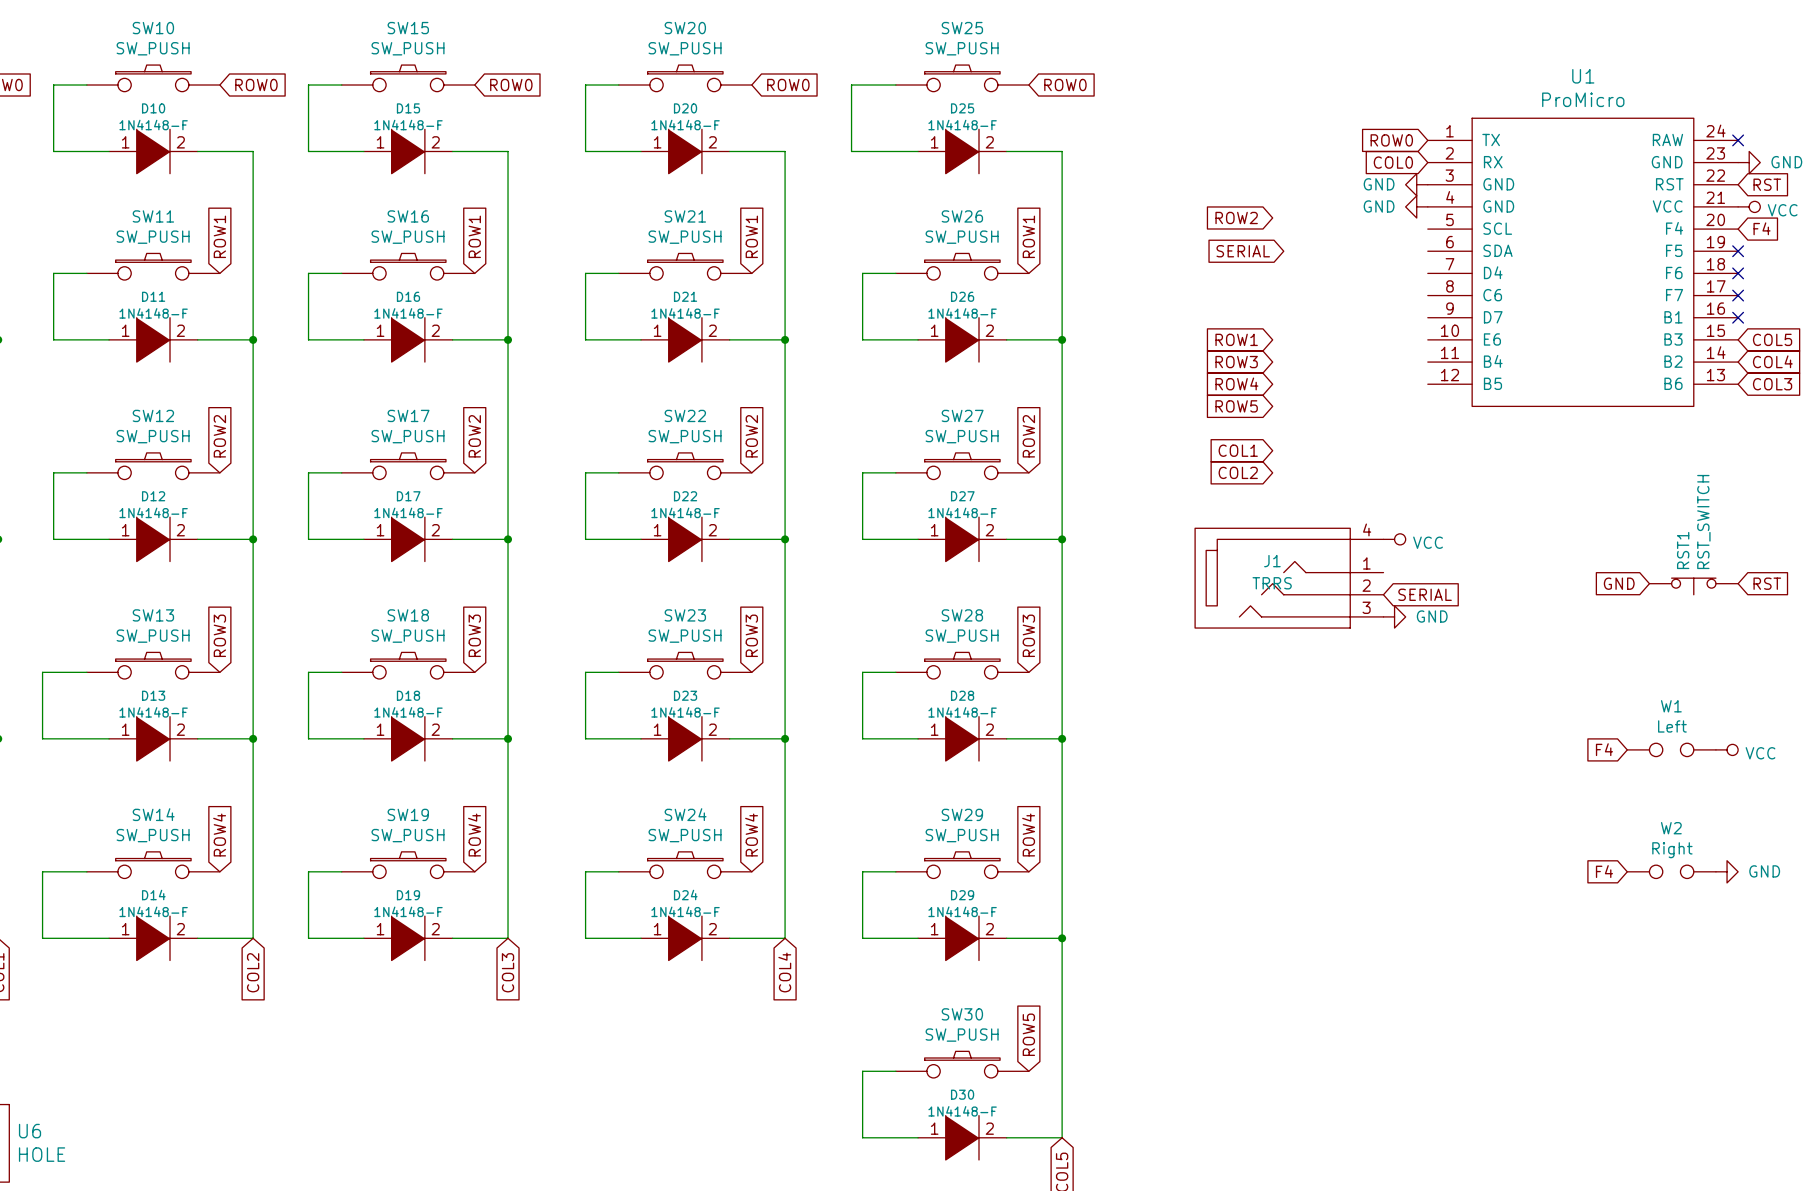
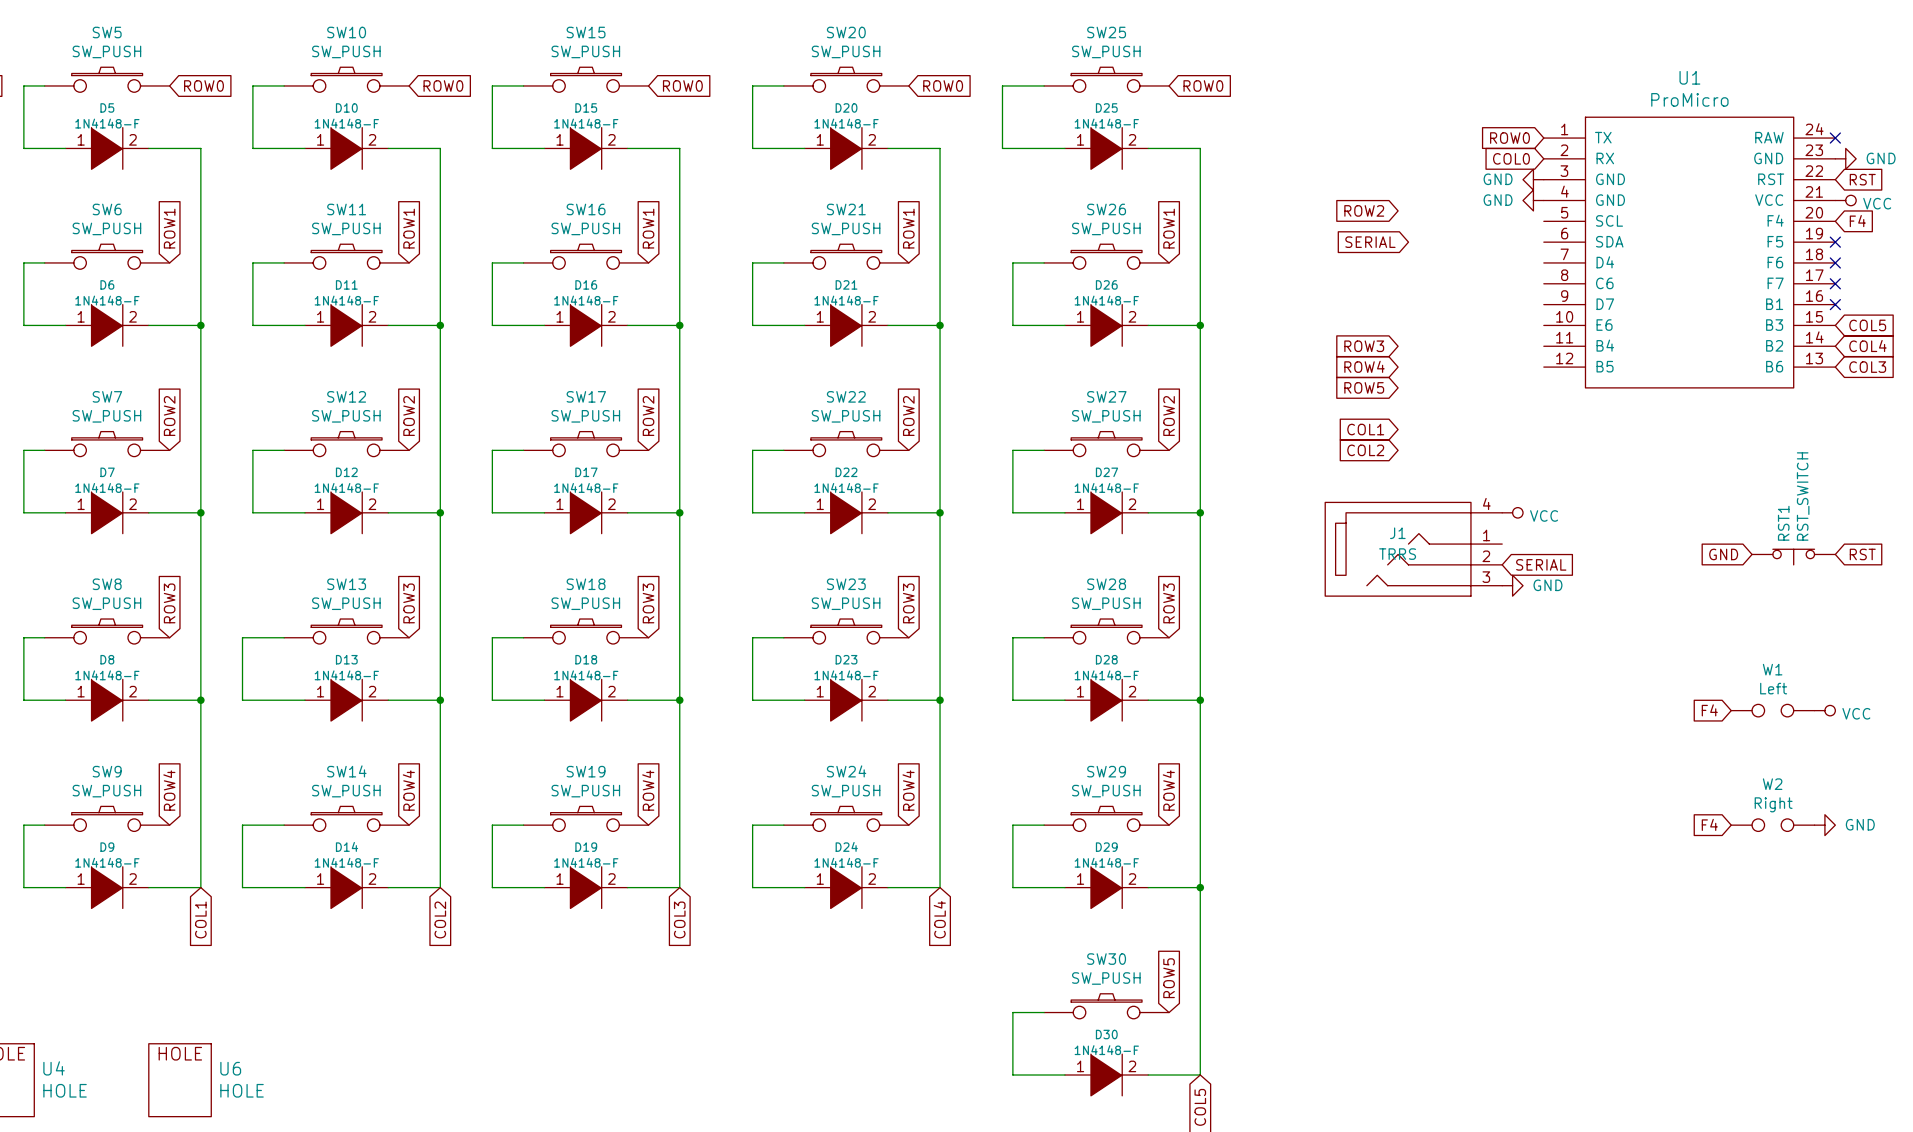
global label: ROW1 (1236, 339) -> none

